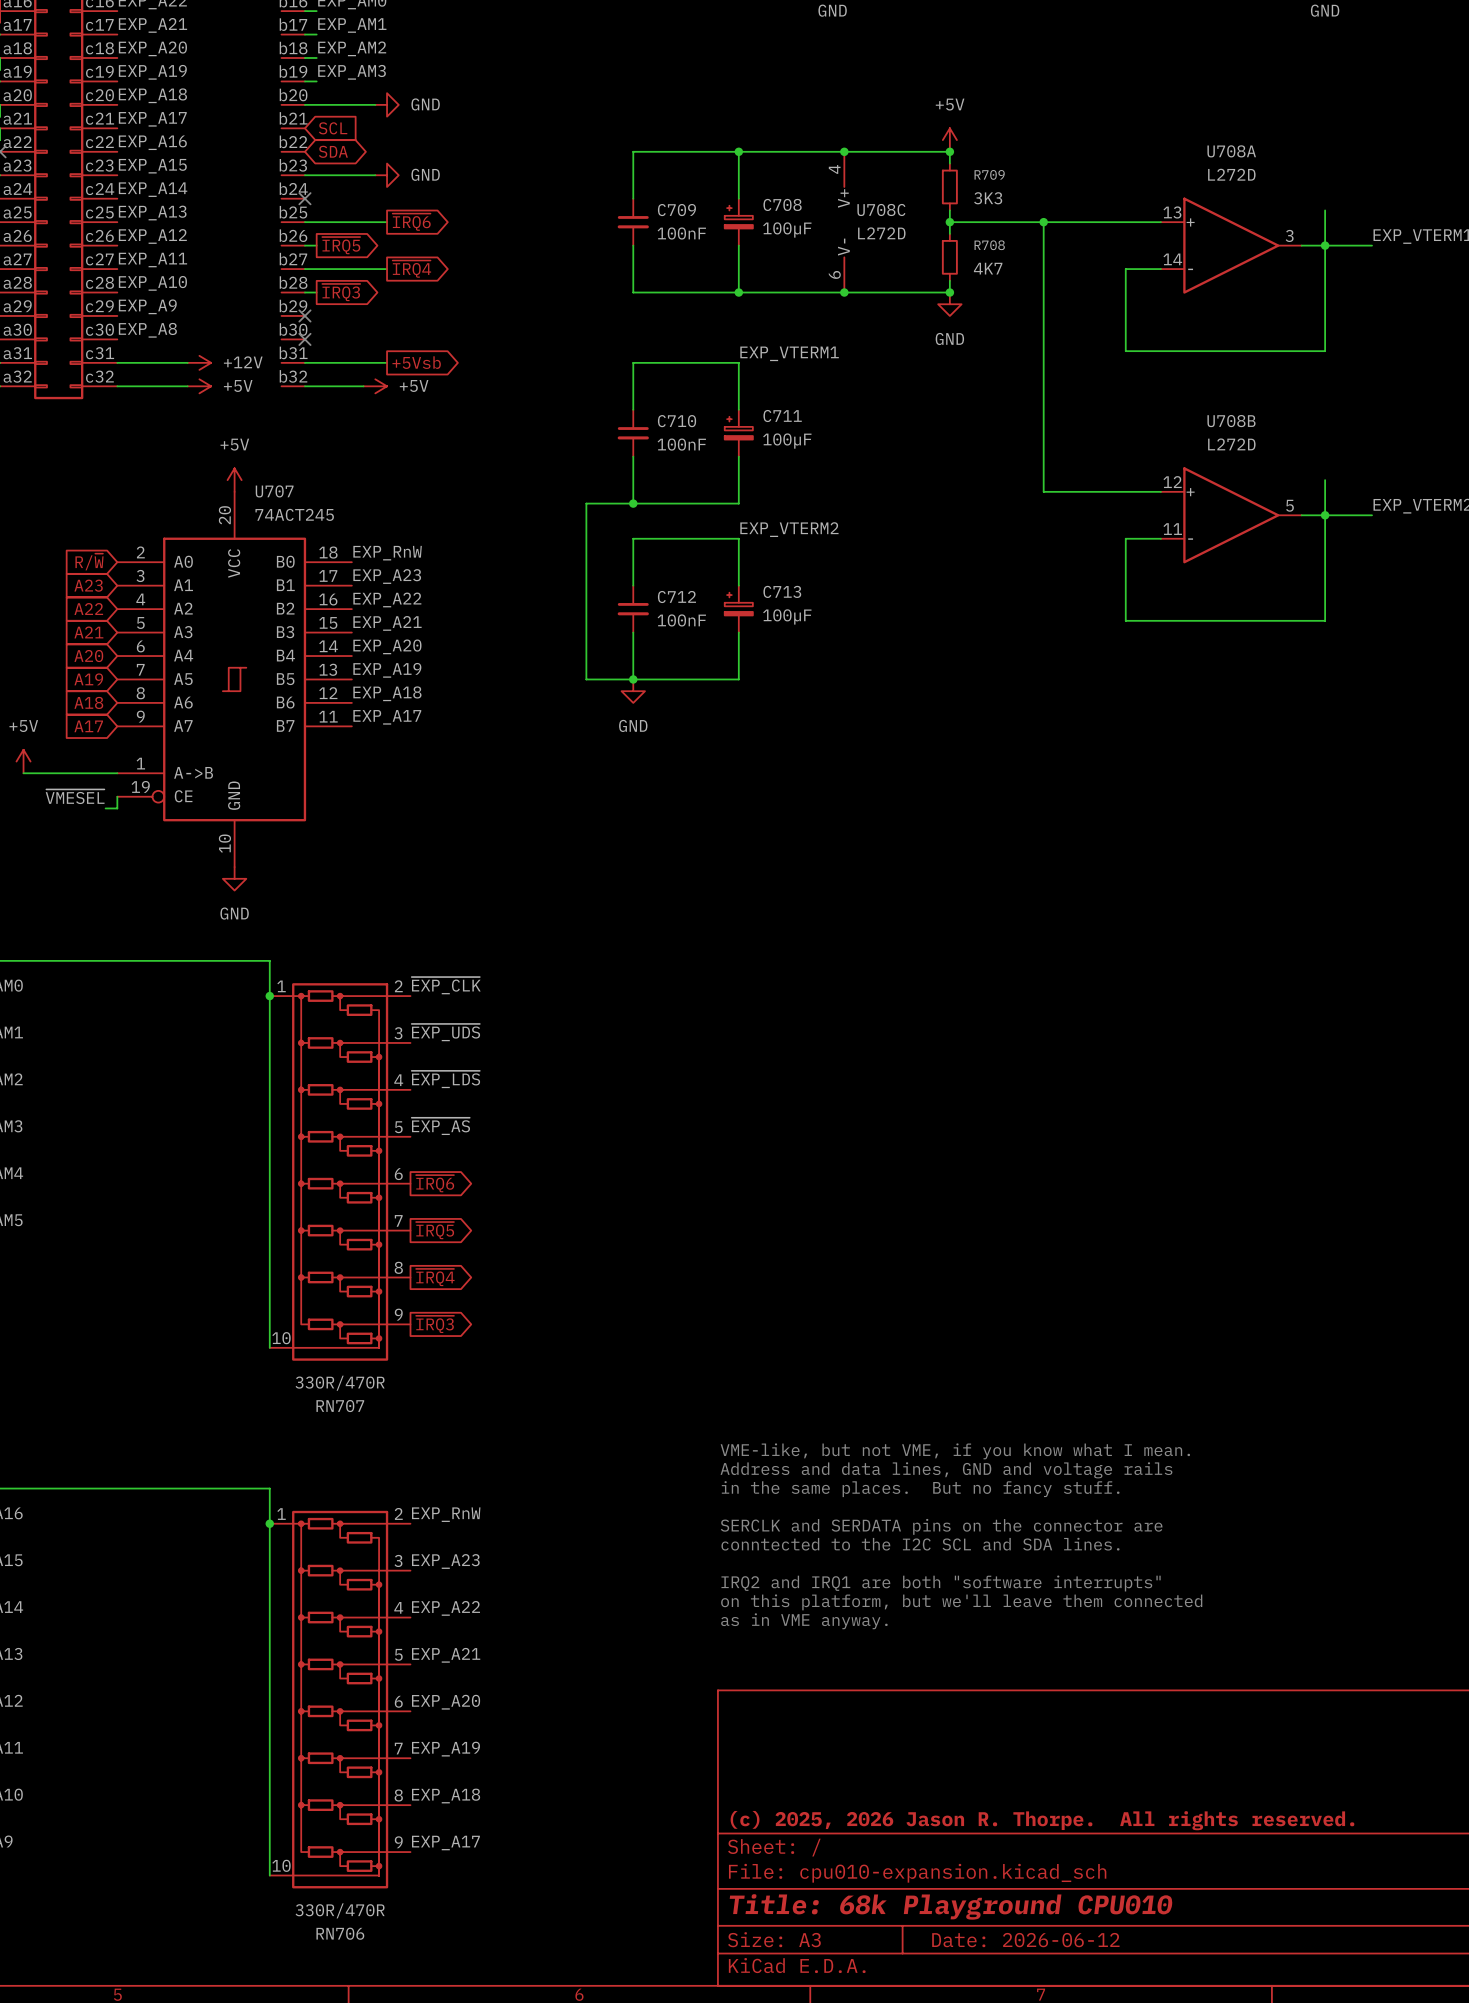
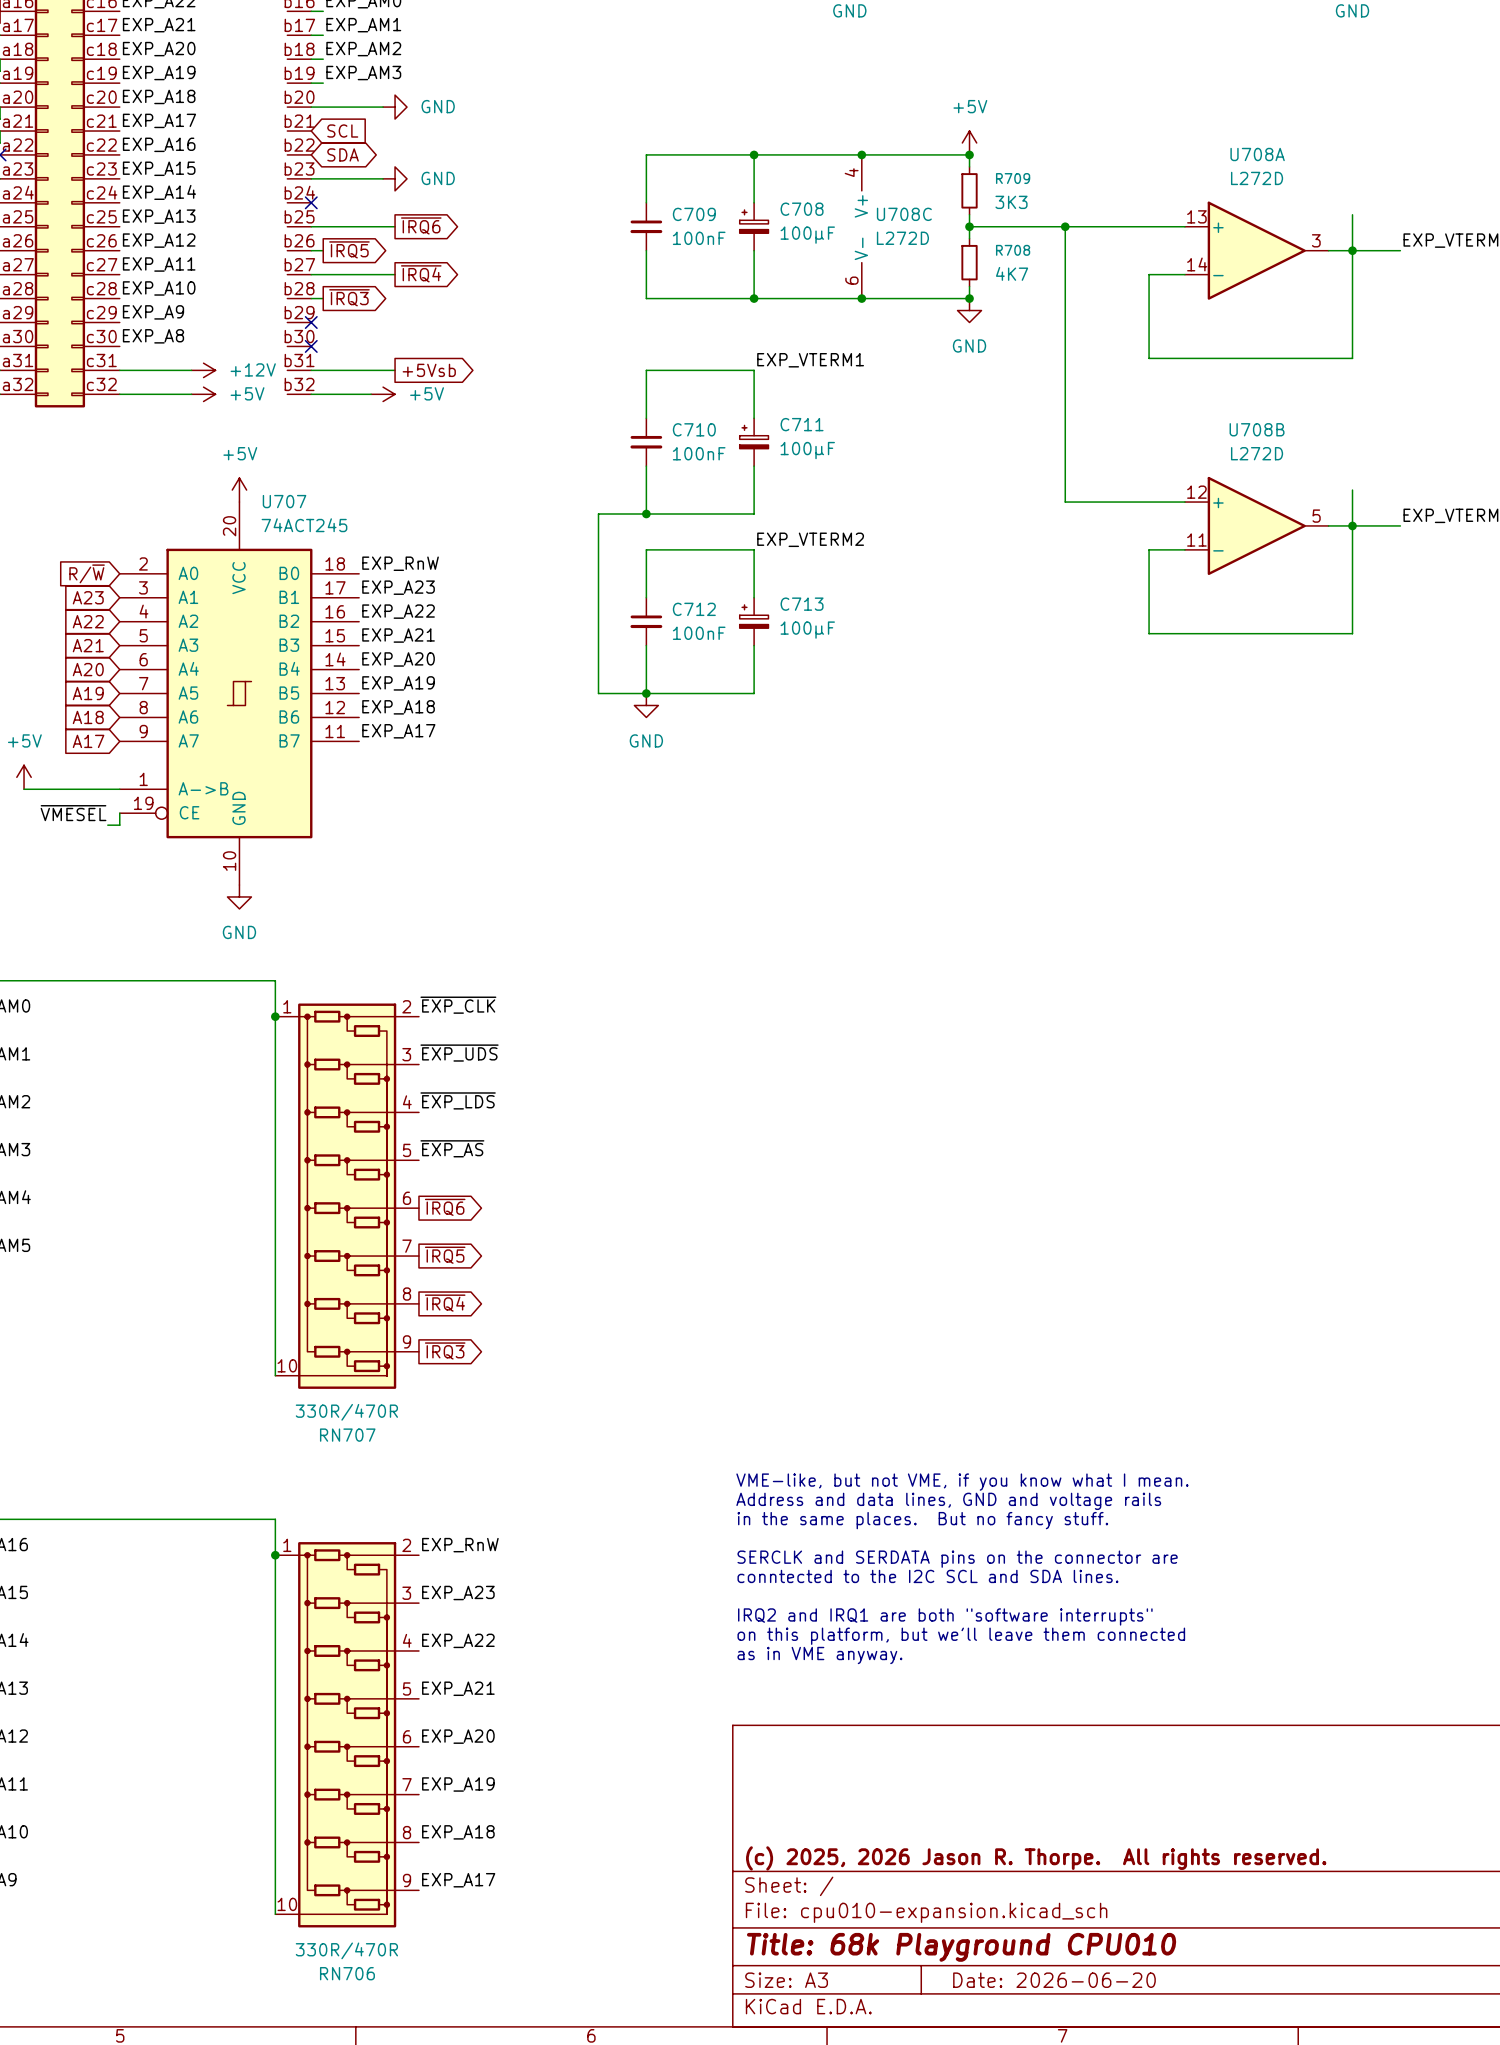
title block: Date: 2026-06-12 (1025, 1940) -> Date: 2026-06-20 (1054, 1980)

